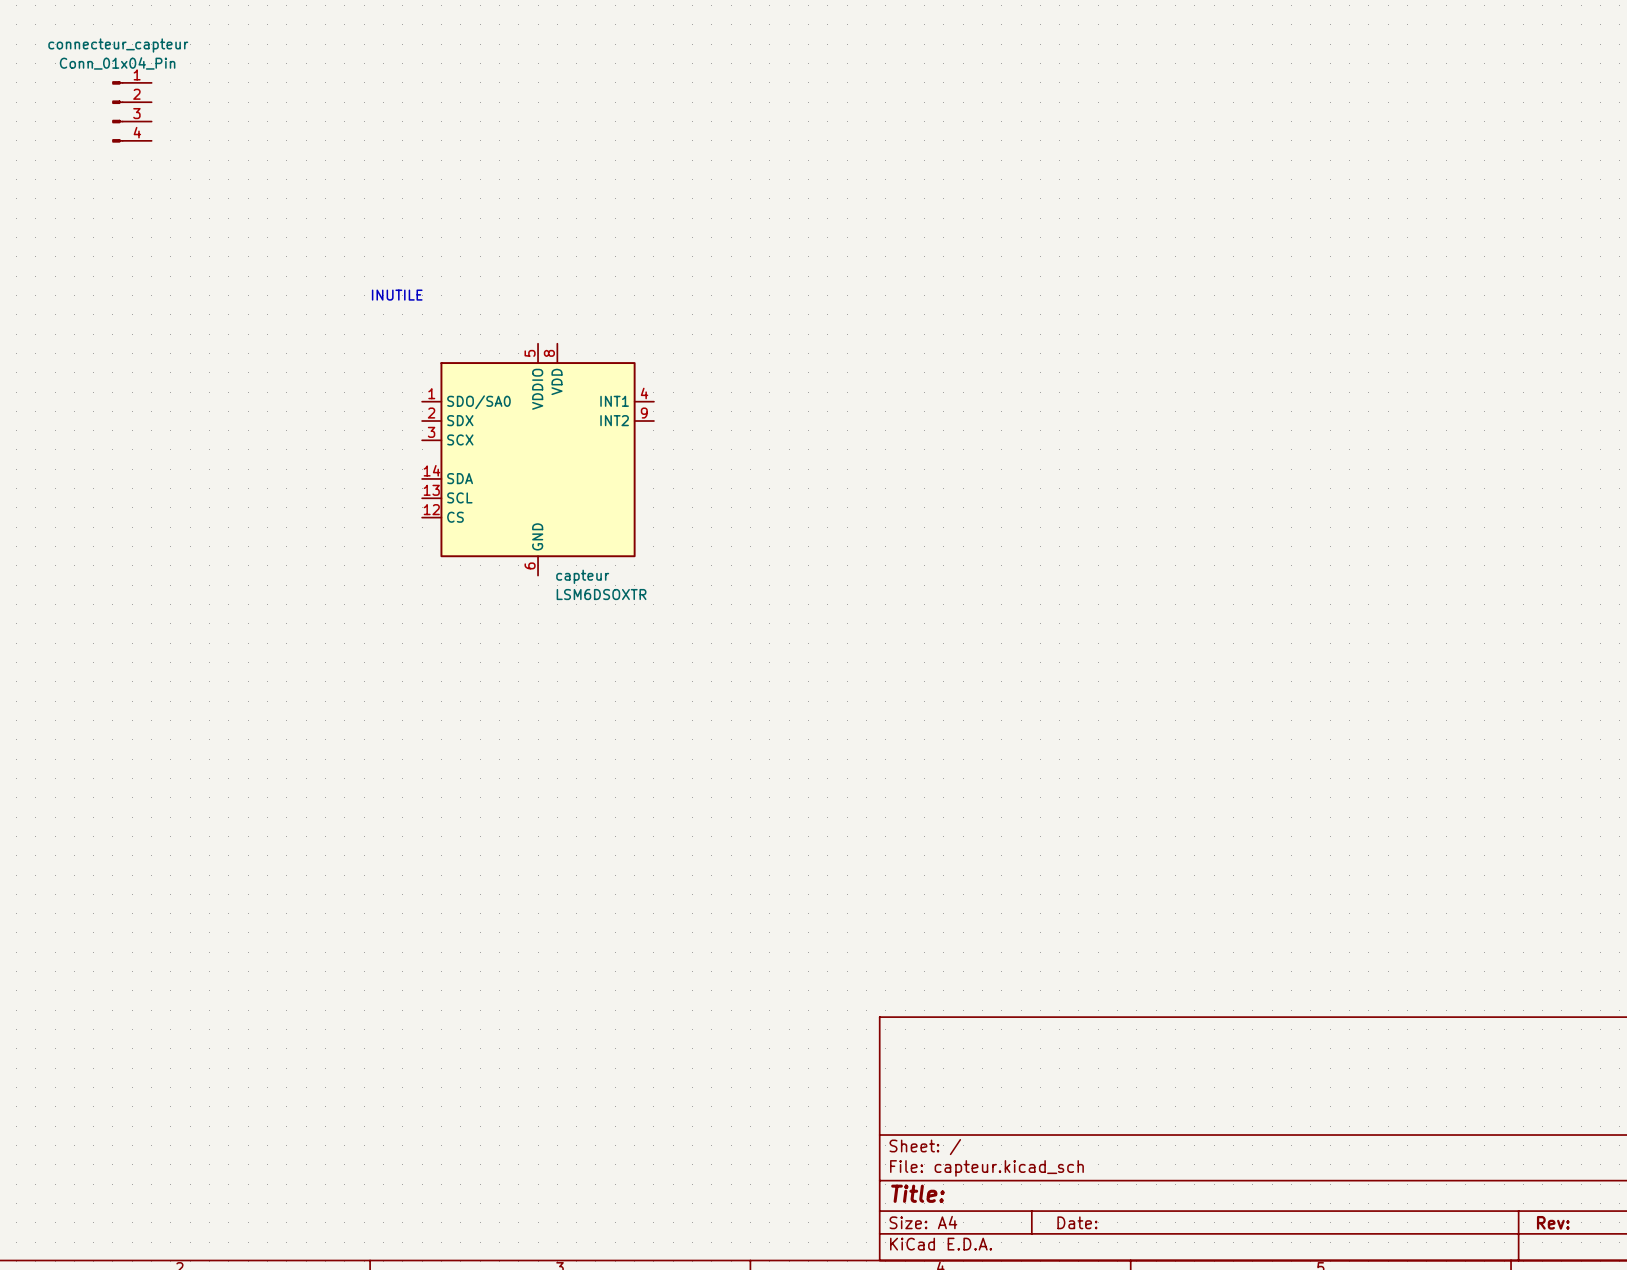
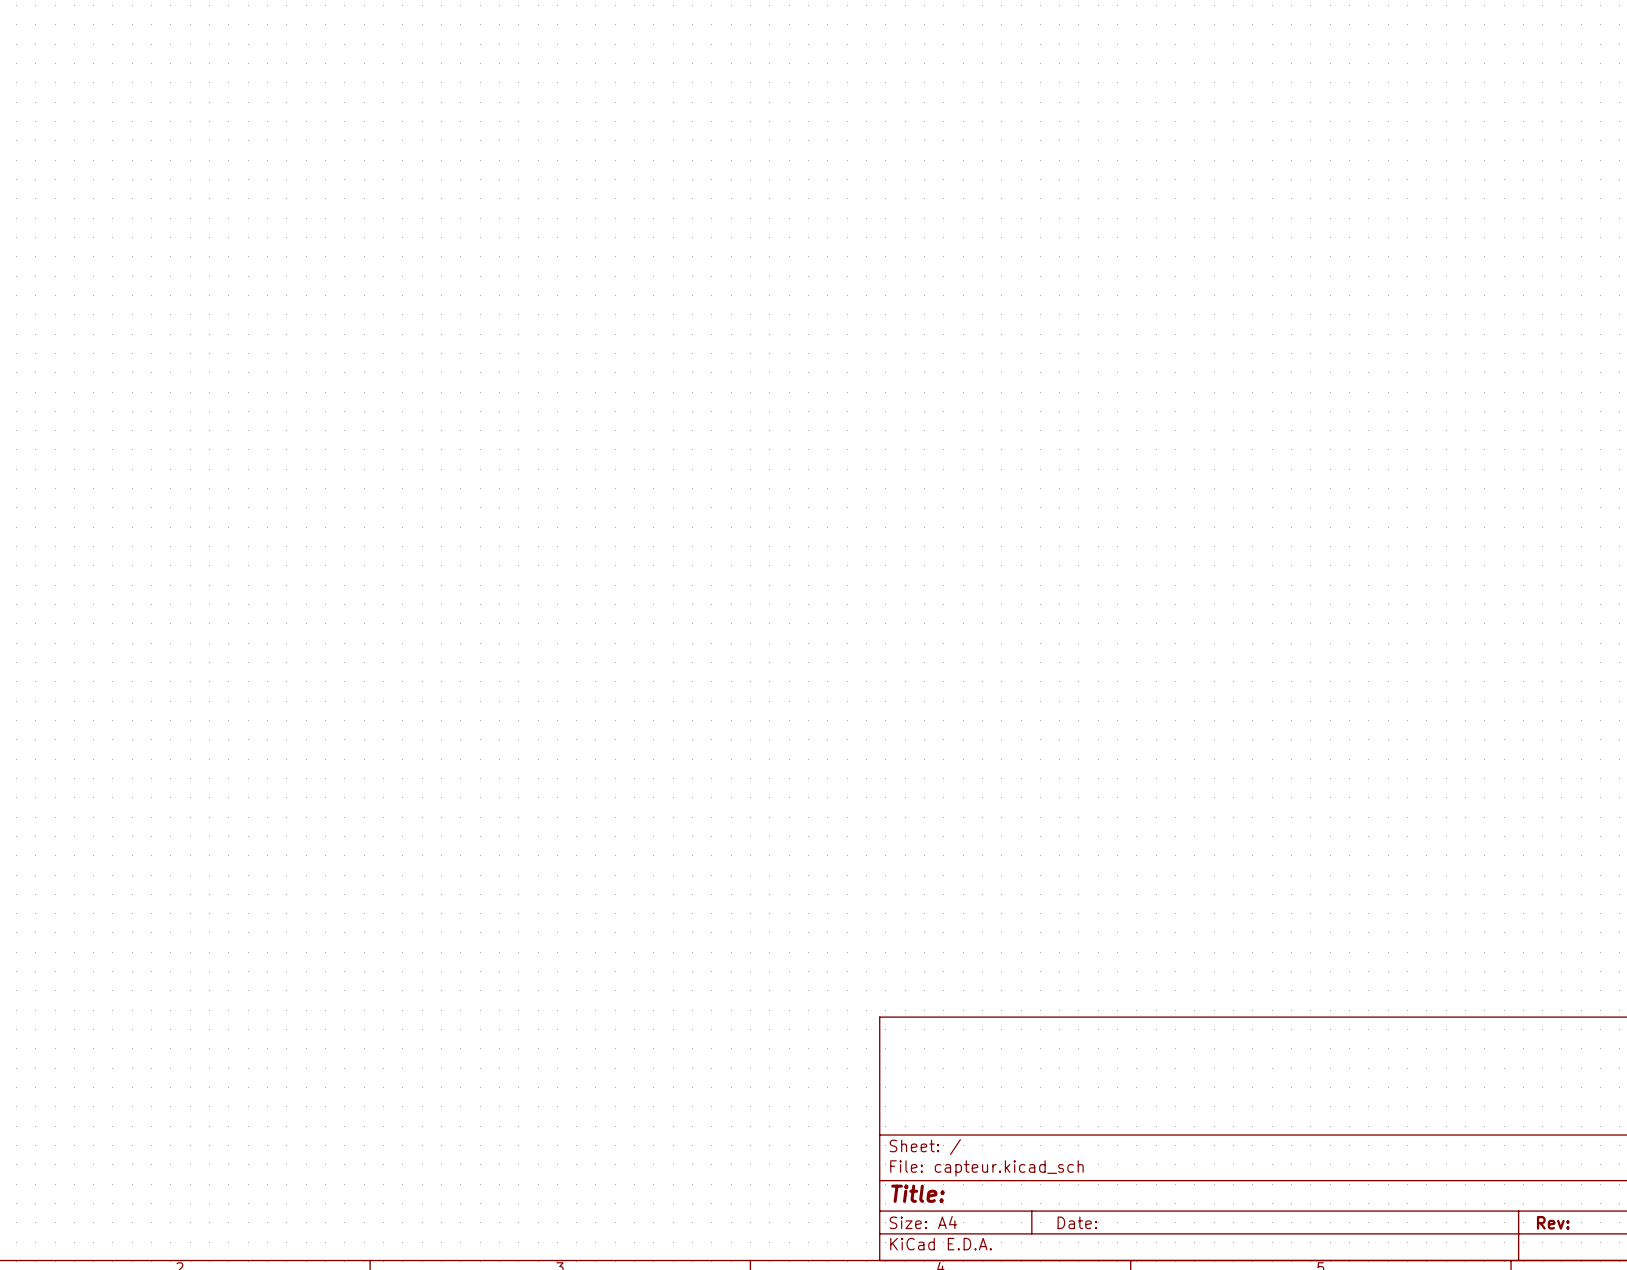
connecteur_capteur: Conn_01x04_Pin (132, 111) -> none
text: INUTILE (397, 295) -> none
capteur: LSM6DSOXTR (538, 459) -> none

